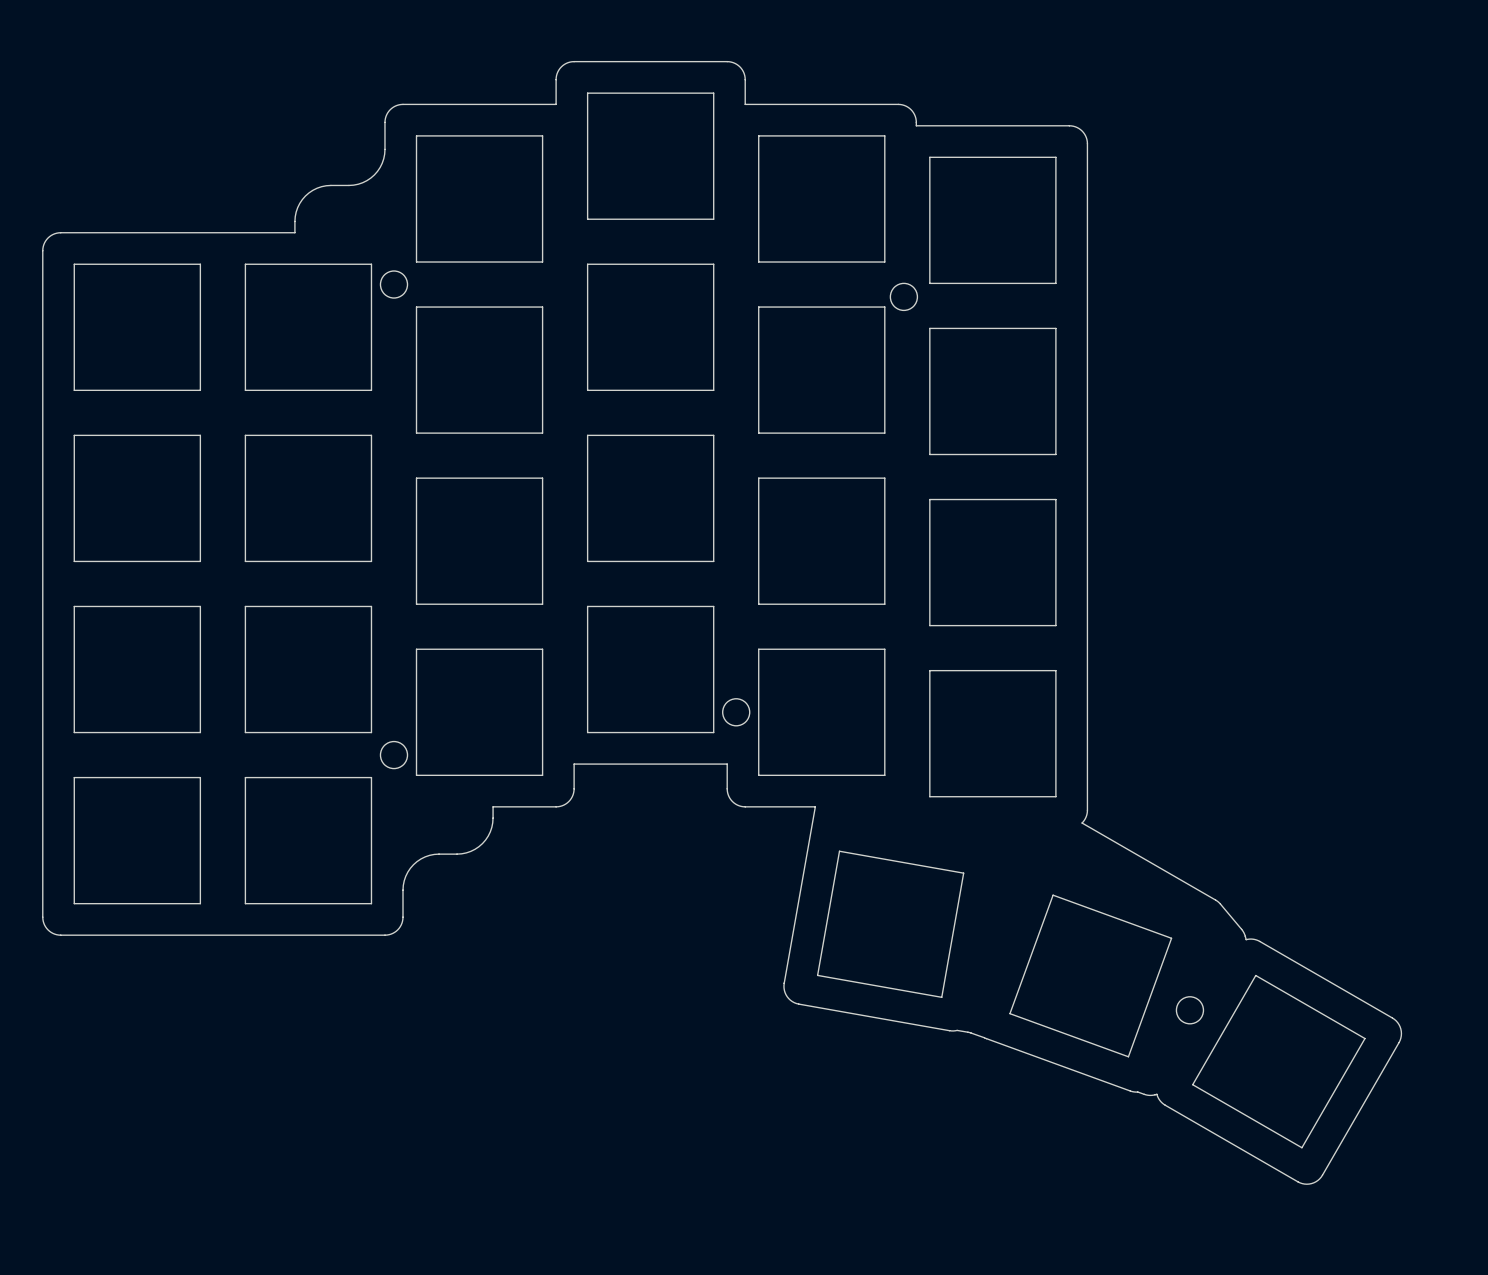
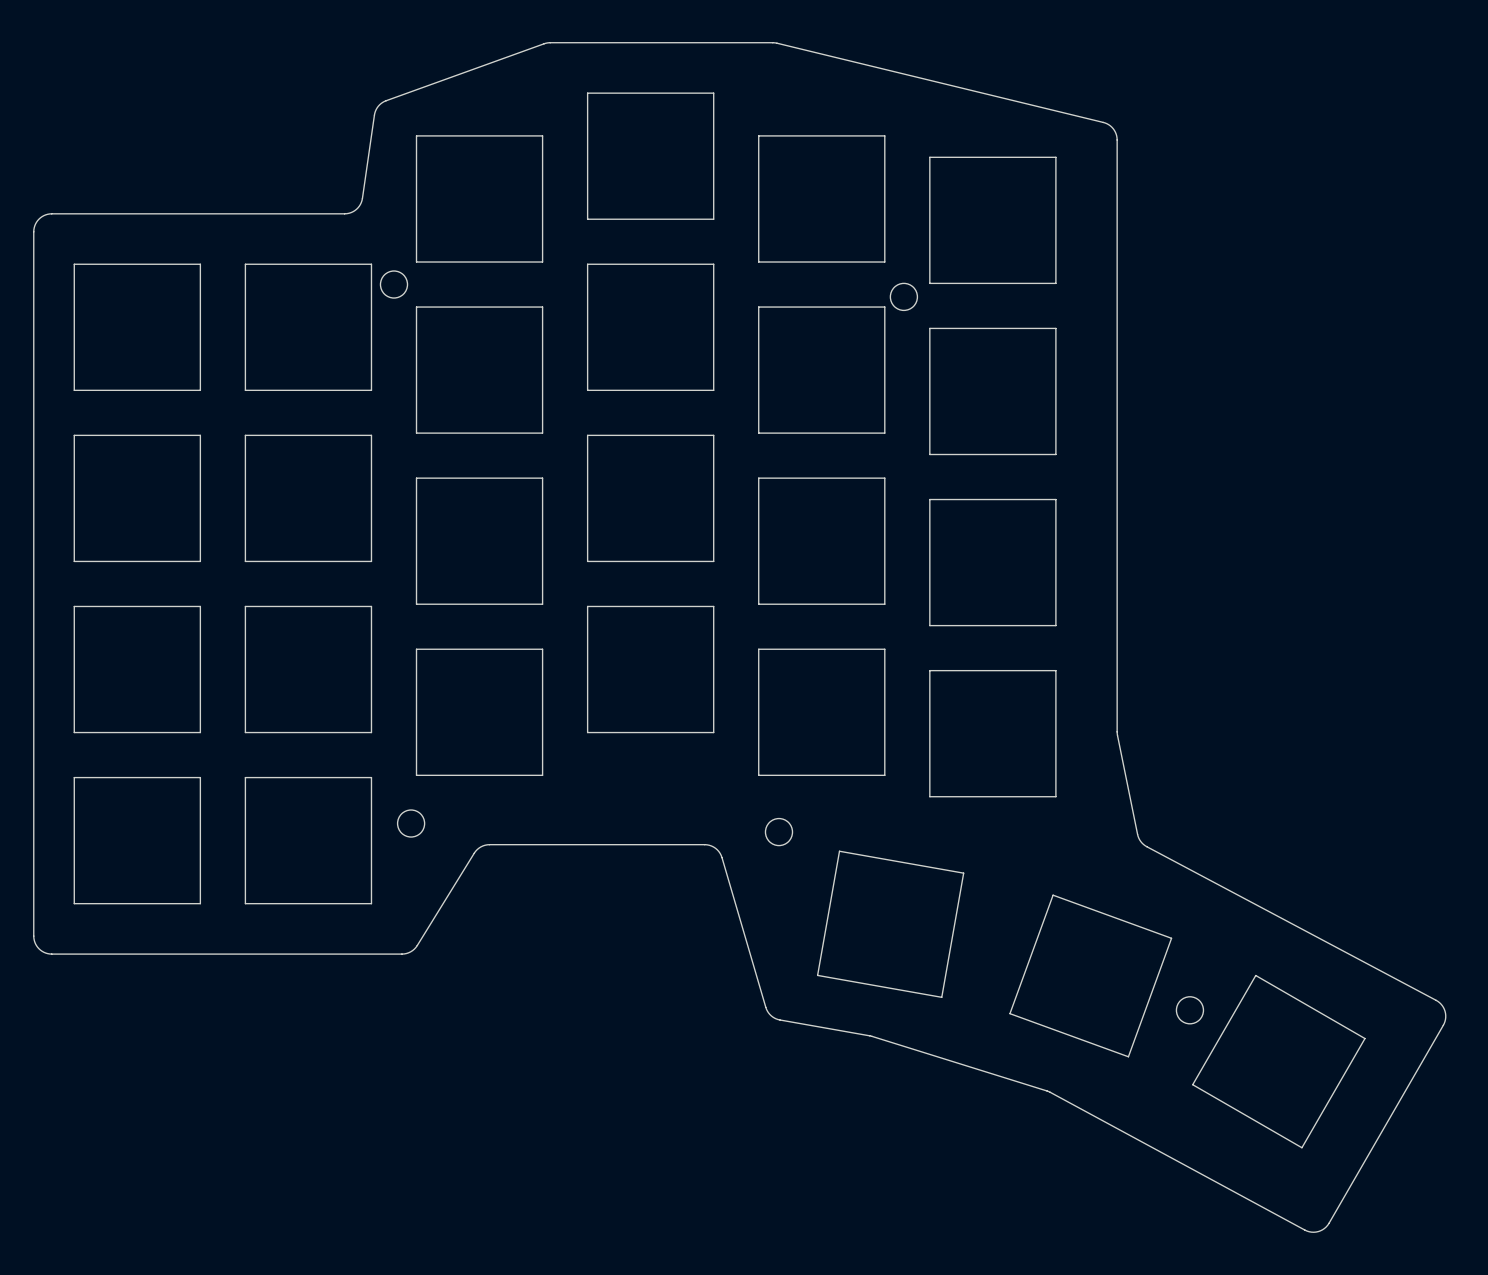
board edge: (574, 61) (729, 61) (738, 65) (744, 73) (745, 104) (900, 104) (912, 111) (916, 125) (1069, 125) (1077, 127) (1084, 134) (1087, 143) (1087, 810) (1082, 823) (1217, 900) (1241, 929) (1246, 939) (1259, 941) (1392, 1018) (1399, 1024) (1401, 1033) (1399, 1042) (1322, 1175) (1315, 1181) (1306, 1184) (1297, 1181) (1165, 1105) (1156, 1094) (1147, 1095) (1130, 1091) (969, 1032) (949, 1030) (792, 1001) (785, 994) (784, 983) (815, 806) (745, 806) (737, 805) (731, 800) (727, 792) (727, 764) (574, 764) (573, 792) (565, 804) (556, 806) (493, 806) (490, 831) (478, 846) (461, 853) (429, 855) (413, 864) (407, 872) (403, 885) (401, 923) (396, 931) (388, 934) (60, 935) (52, 933) (45, 926) (42, 917) (42, 250) (45, 241) (52, 234) (60, 232) (294, 232) (297, 207) (309, 192) (326, 185) (358, 184) (366, 180) (377, 171) (384, 154) (385, 118) (393, 107) (403, 104) (556, 104) (557, 71) (564, 64) (574, 61) -> (550, 42) (381, 103) (374, 115) (362, 200) (357, 207) (350, 212) (51, 213) (43, 215) (36, 222) (33, 231) (33, 936) (36, 945) (43, 952) (51, 954) (404, 953) (415, 947) (474, 853) (482, 845) (709, 845) (715, 848) (721, 855) (765, 1007) (774, 1017) (870, 1036) (1048, 1091) (1304, 1230) (1313, 1232) (1322, 1229) (1329, 1223) (1443, 1025) (1445, 1013) (1442, 1005) (1436, 1000) (1146, 846) (1138, 836) (1117, 731) (1117, 139) (1114, 130) (1103, 122) (774, 42) (550, 42)
round board edge position: (736, 712) -> (778, 832)
round board edge position: (393, 755) -> (411, 823)

